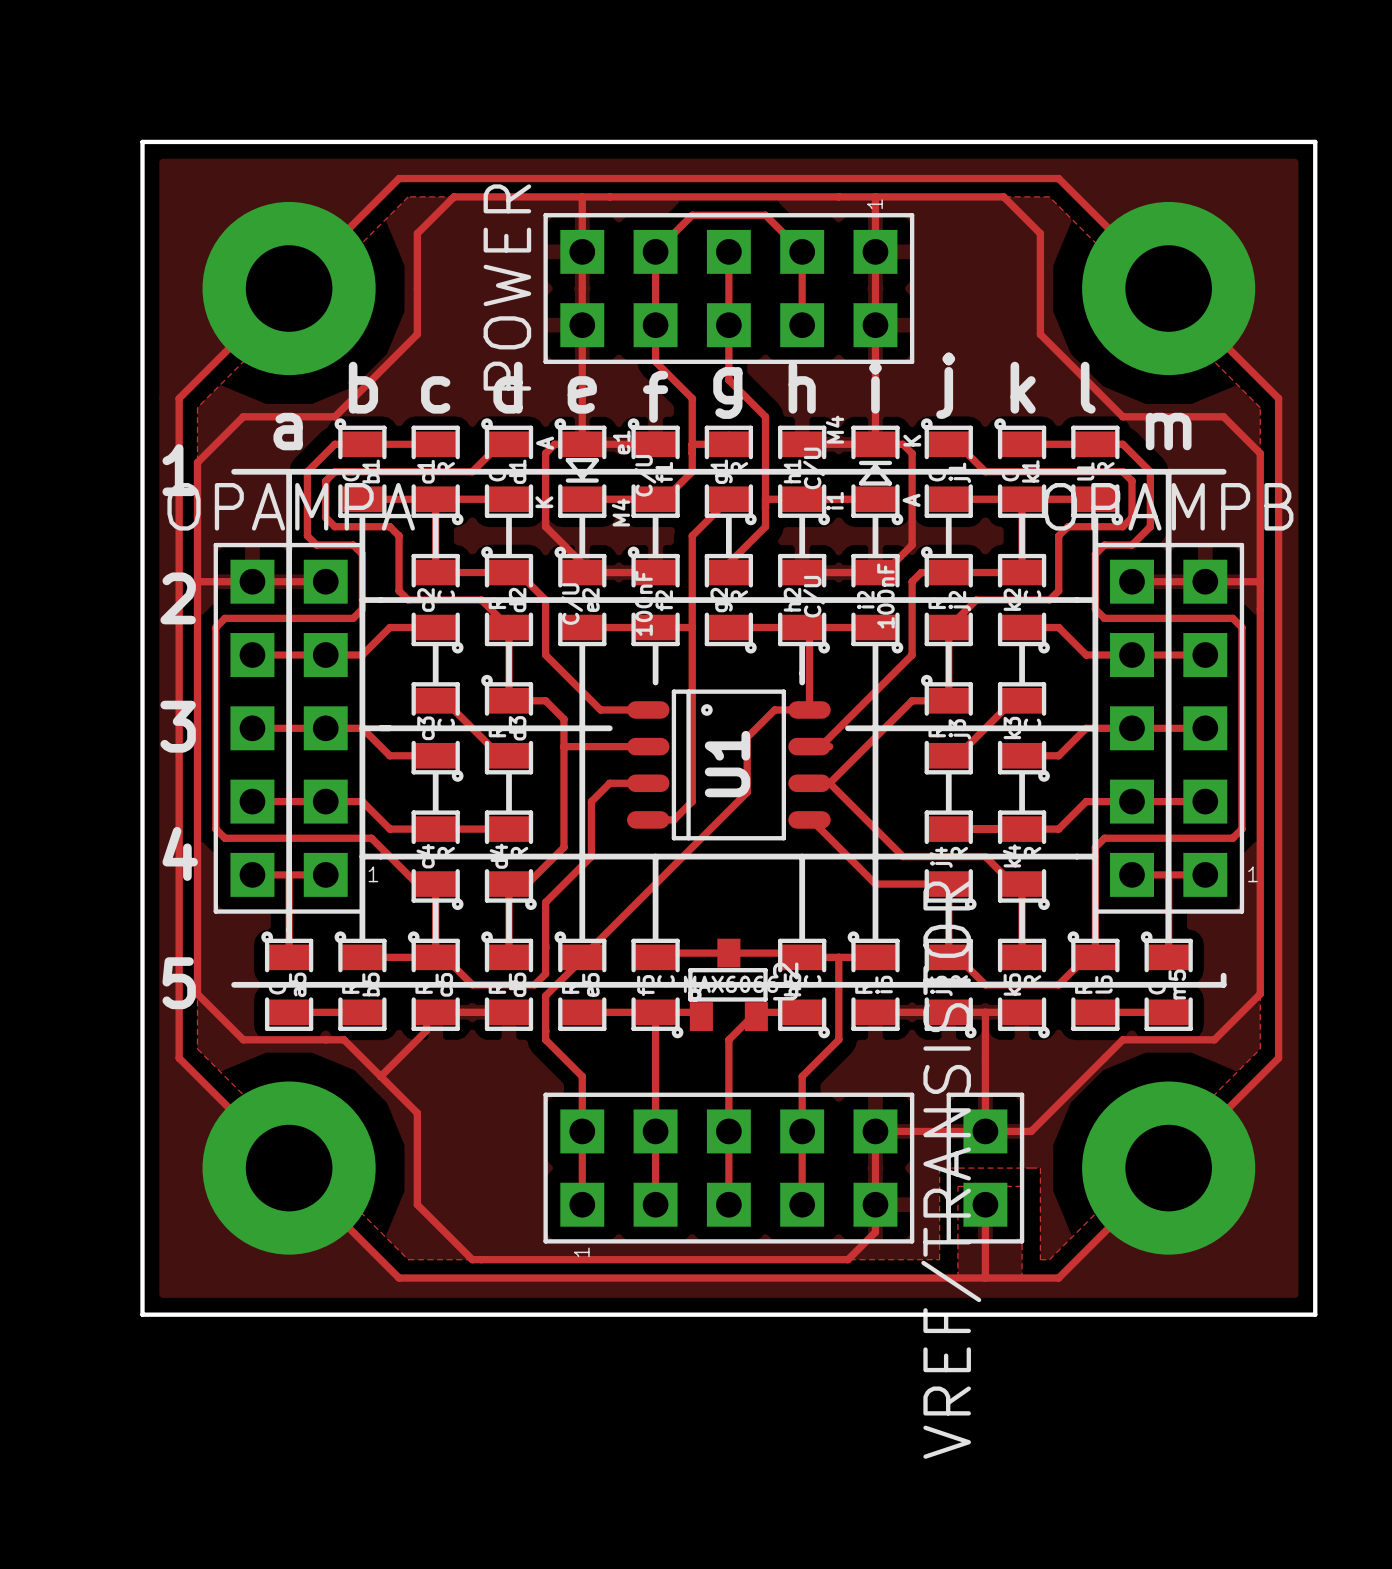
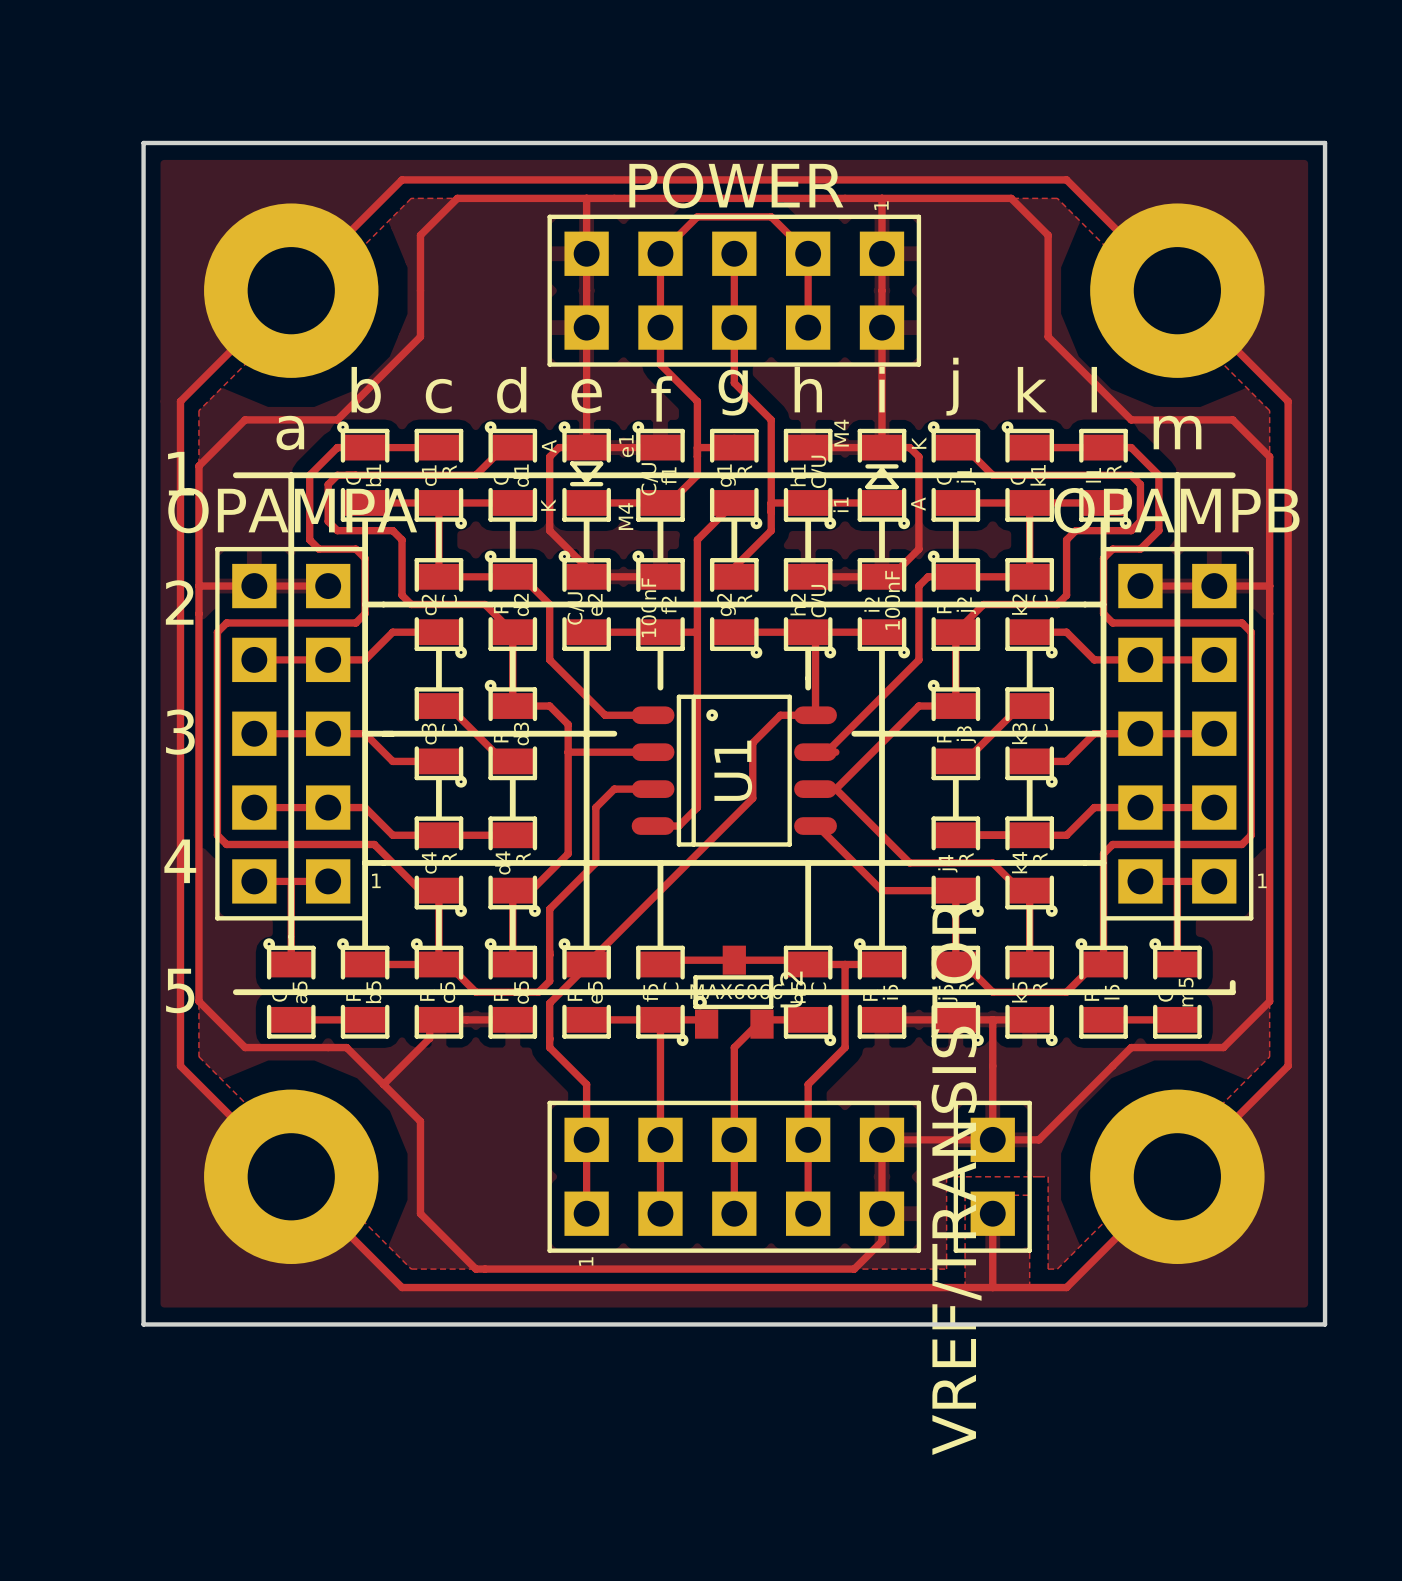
part value rotation: 0° (507, 287) -> 90° clockwise (736, 185)

